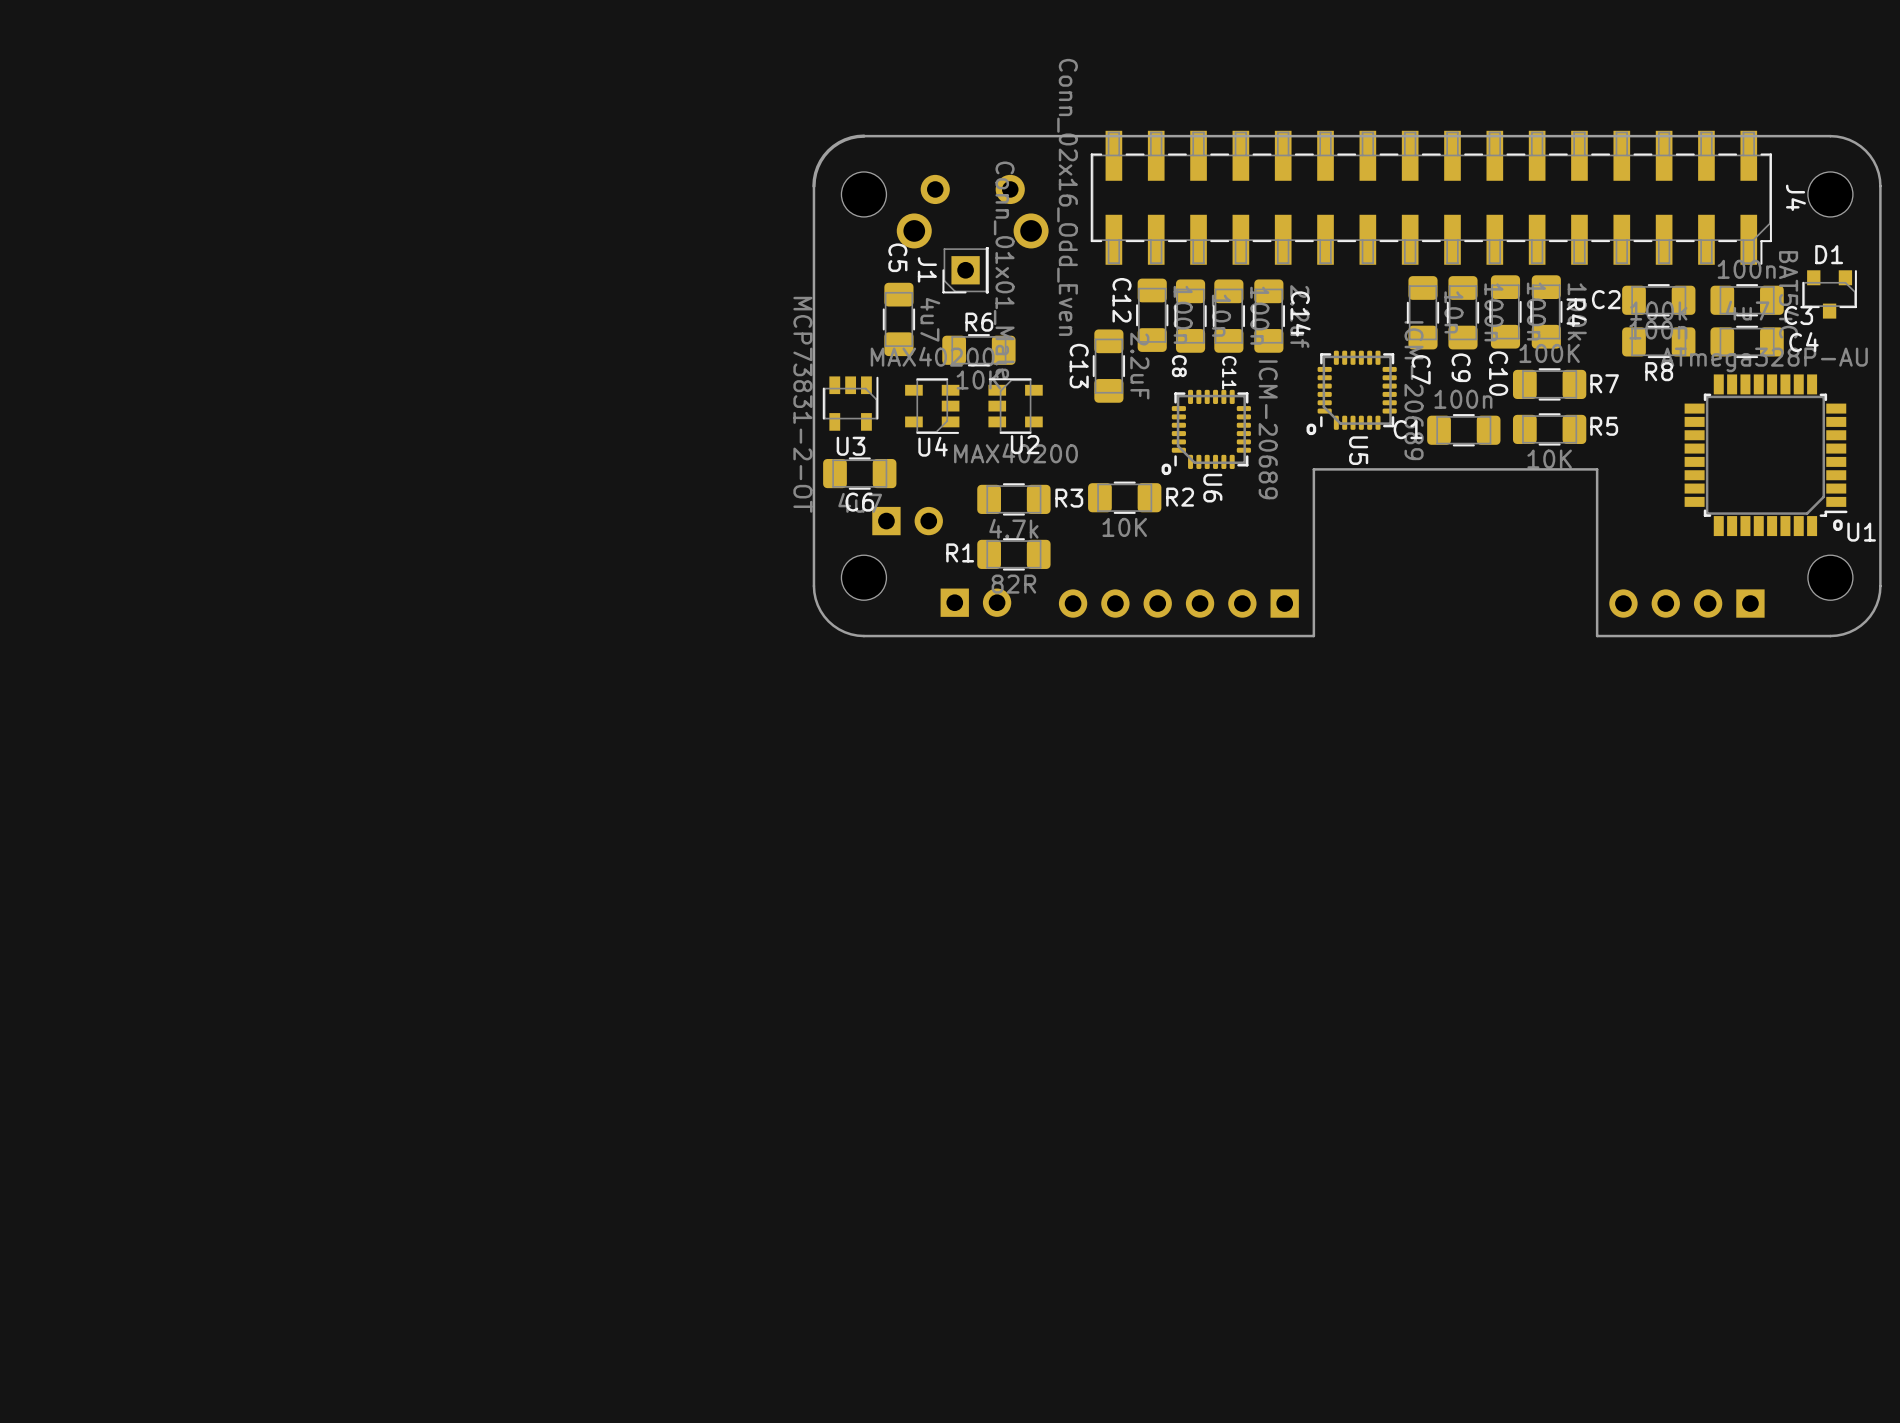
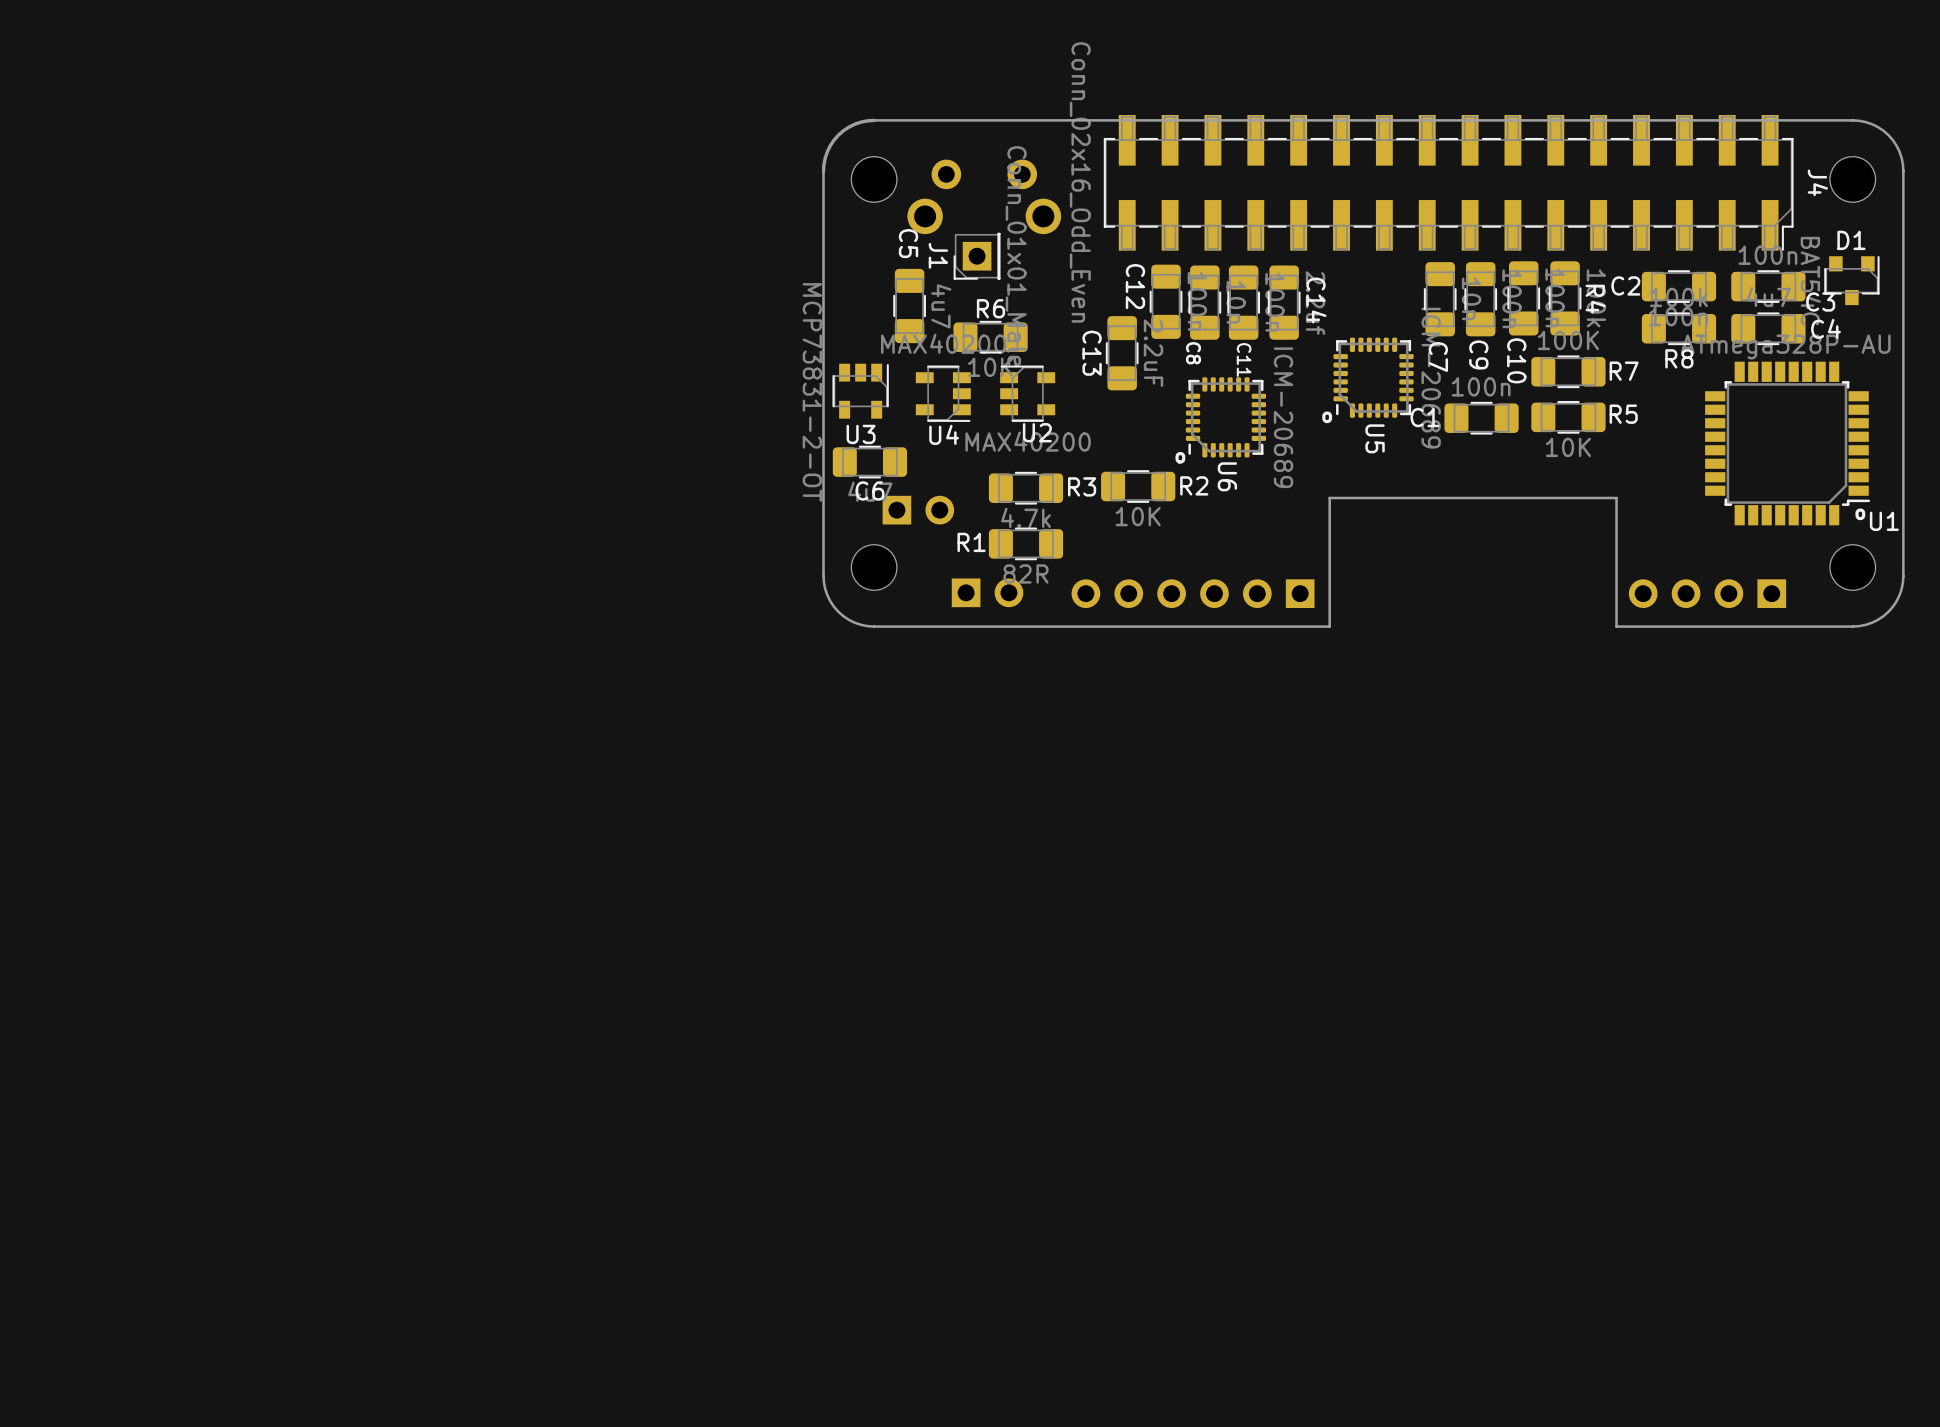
board edge: (1597, 509) (1597, 469) (1313, 469) (1313, 509) -> (1616, 498) (1329, 498)

